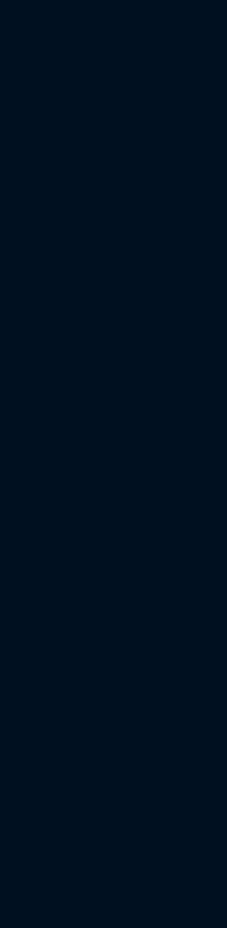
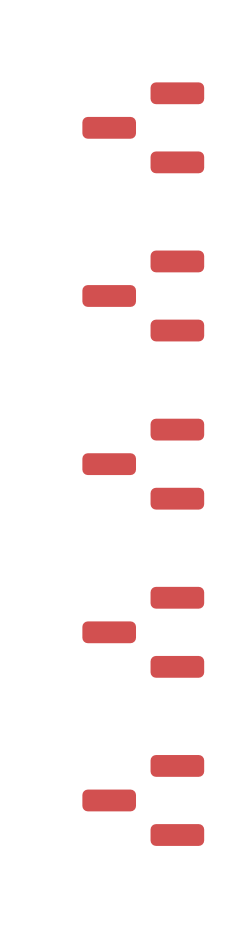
part: none -> (143, 127)
part: none -> (143, 295)
part: none -> (143, 464)
part: none -> (143, 632)
part: none -> (143, 800)

